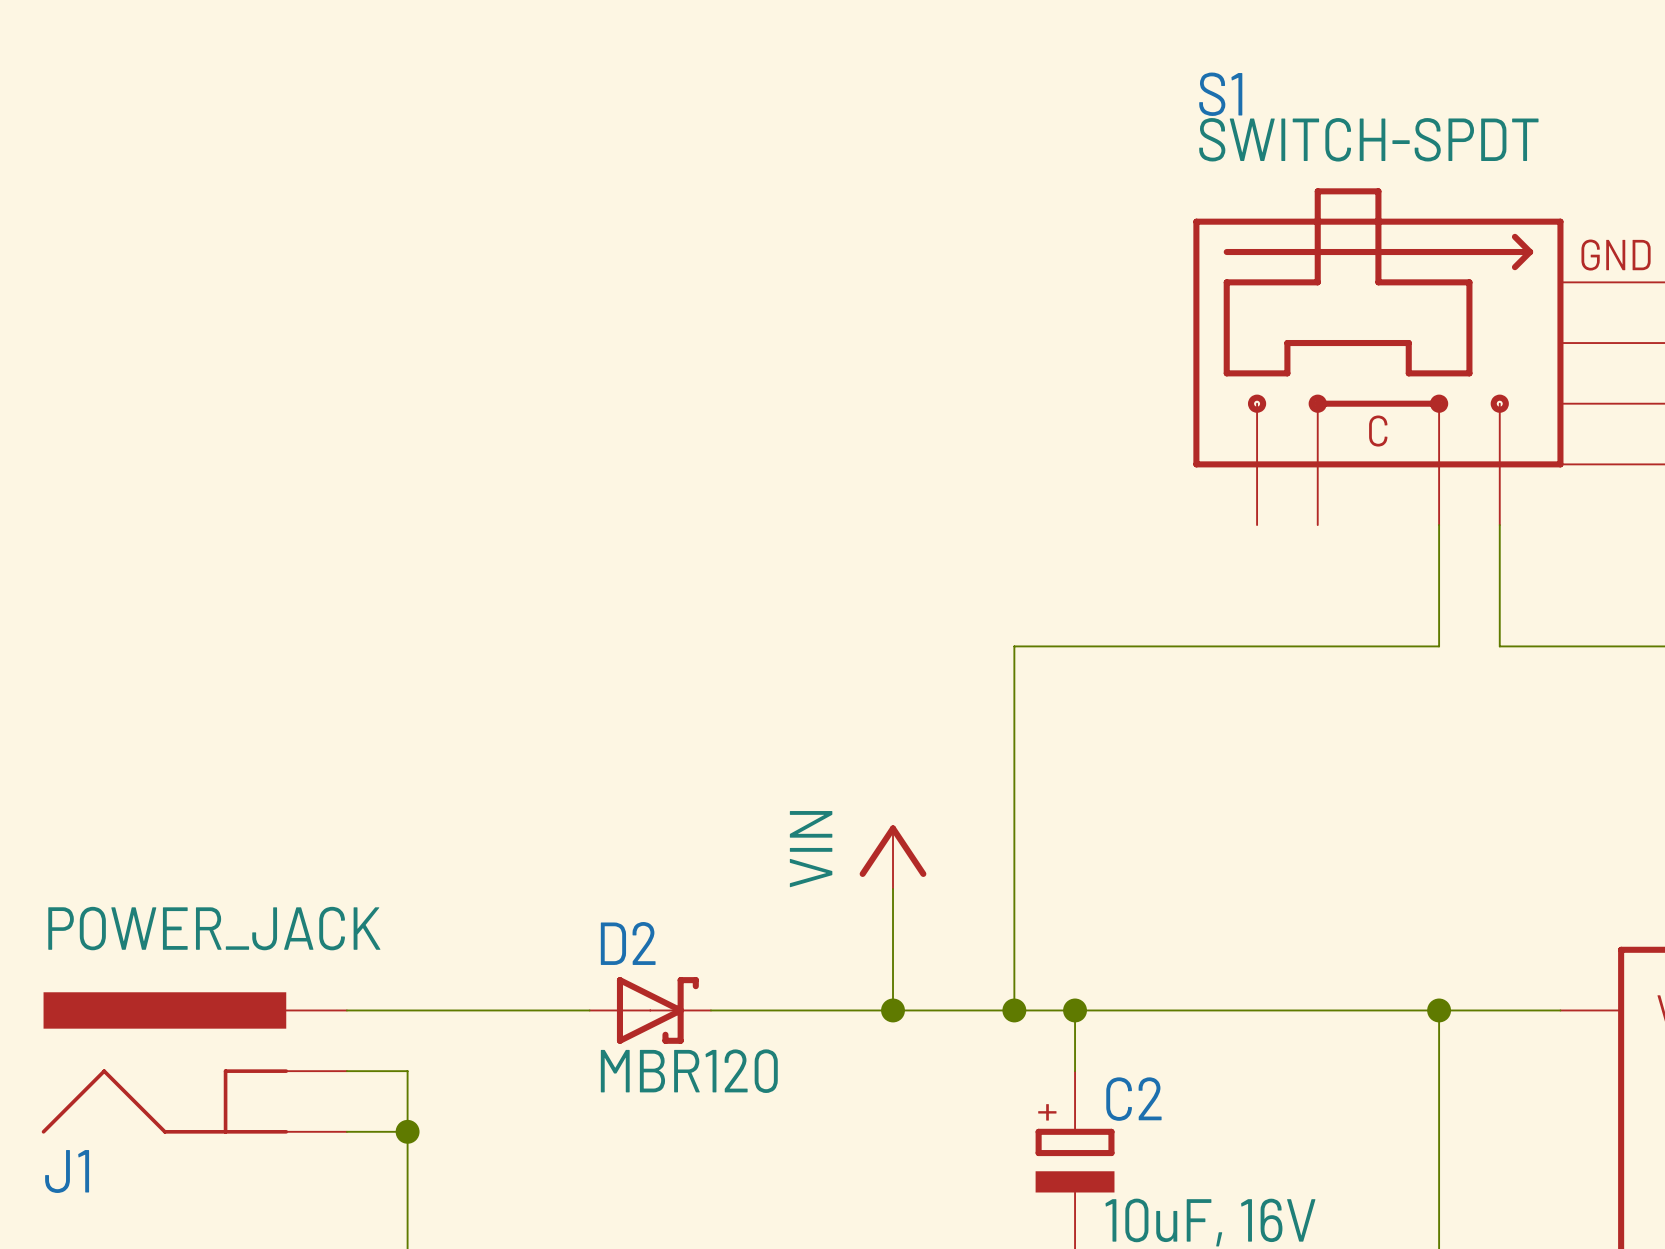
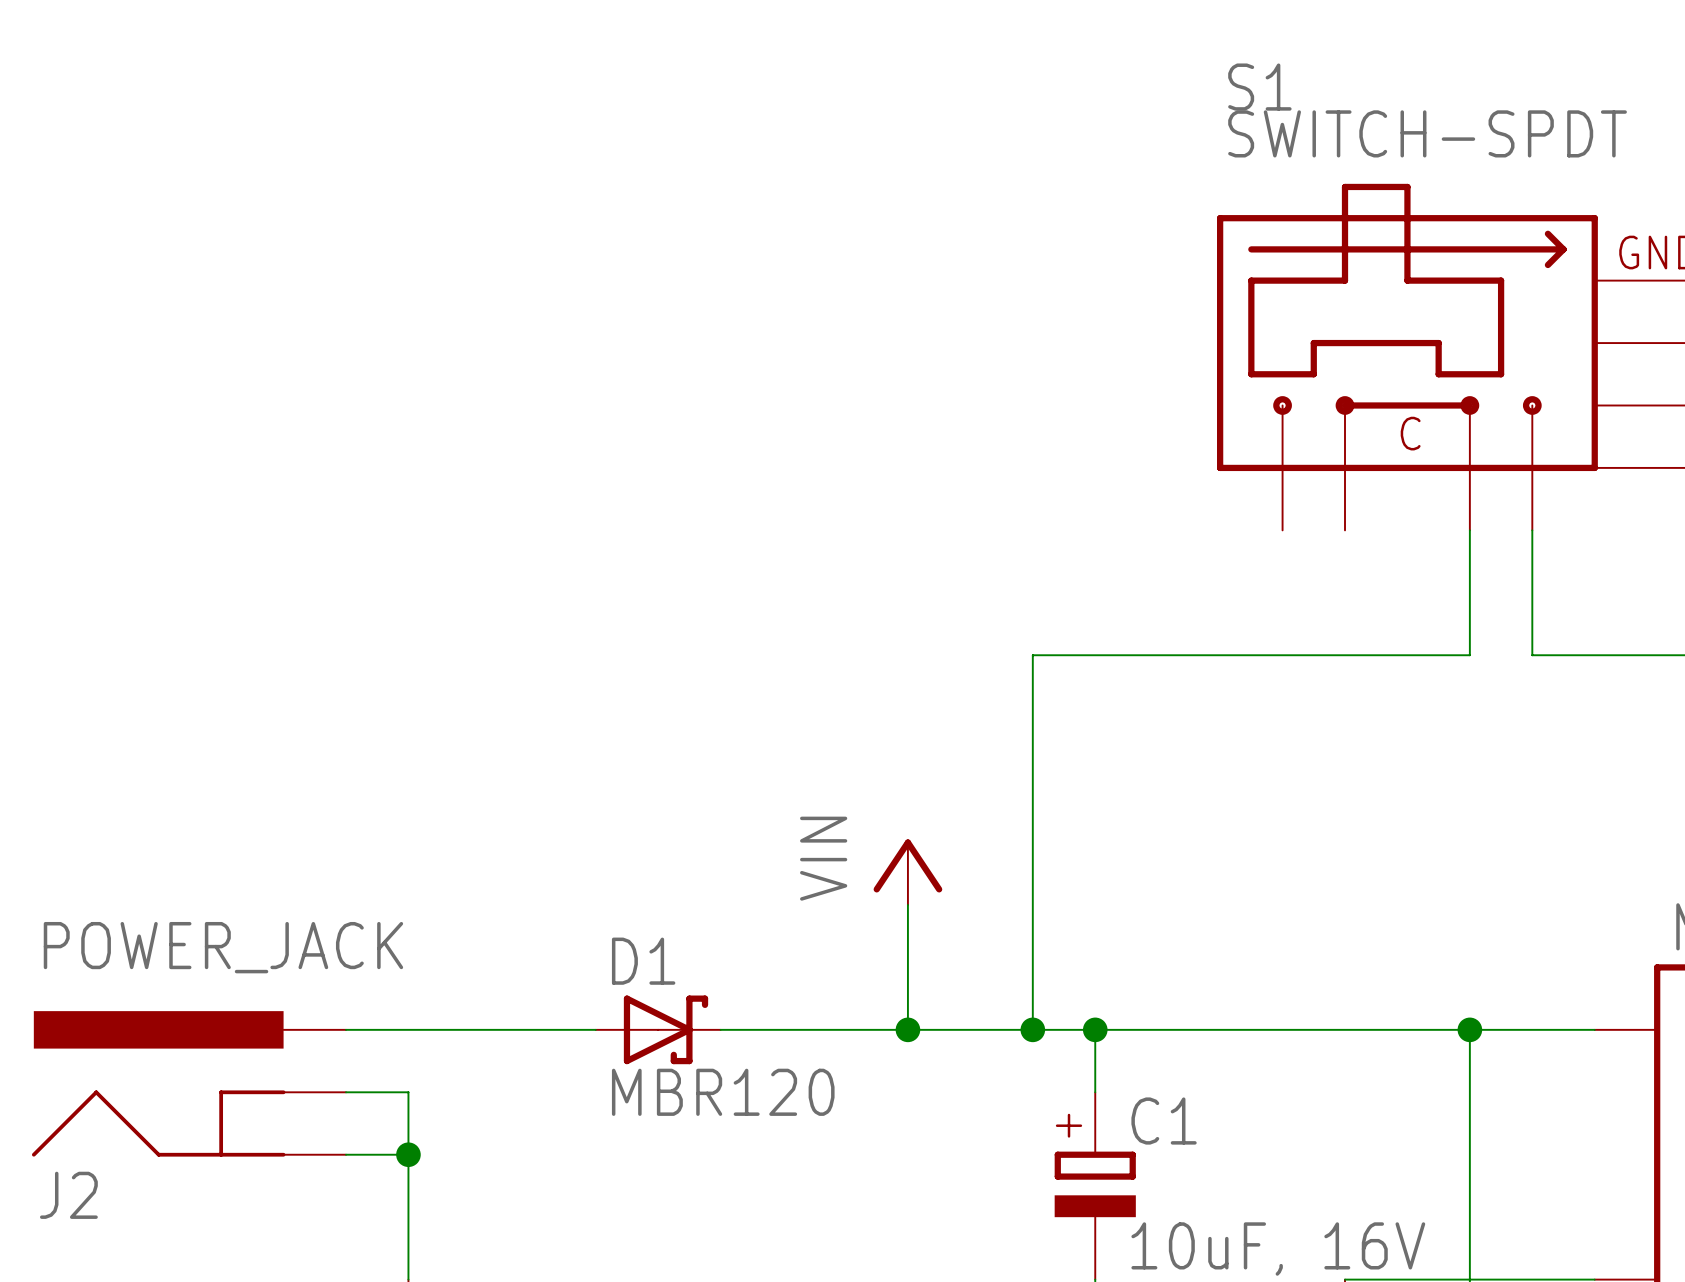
D2 name: D2 (628, 943) -> D1 (643, 961)
C2 name: C2 (1133, 1099) -> C1 (1164, 1121)
J1 name: J1 (67, 1171) -> J2 (68, 1195)

